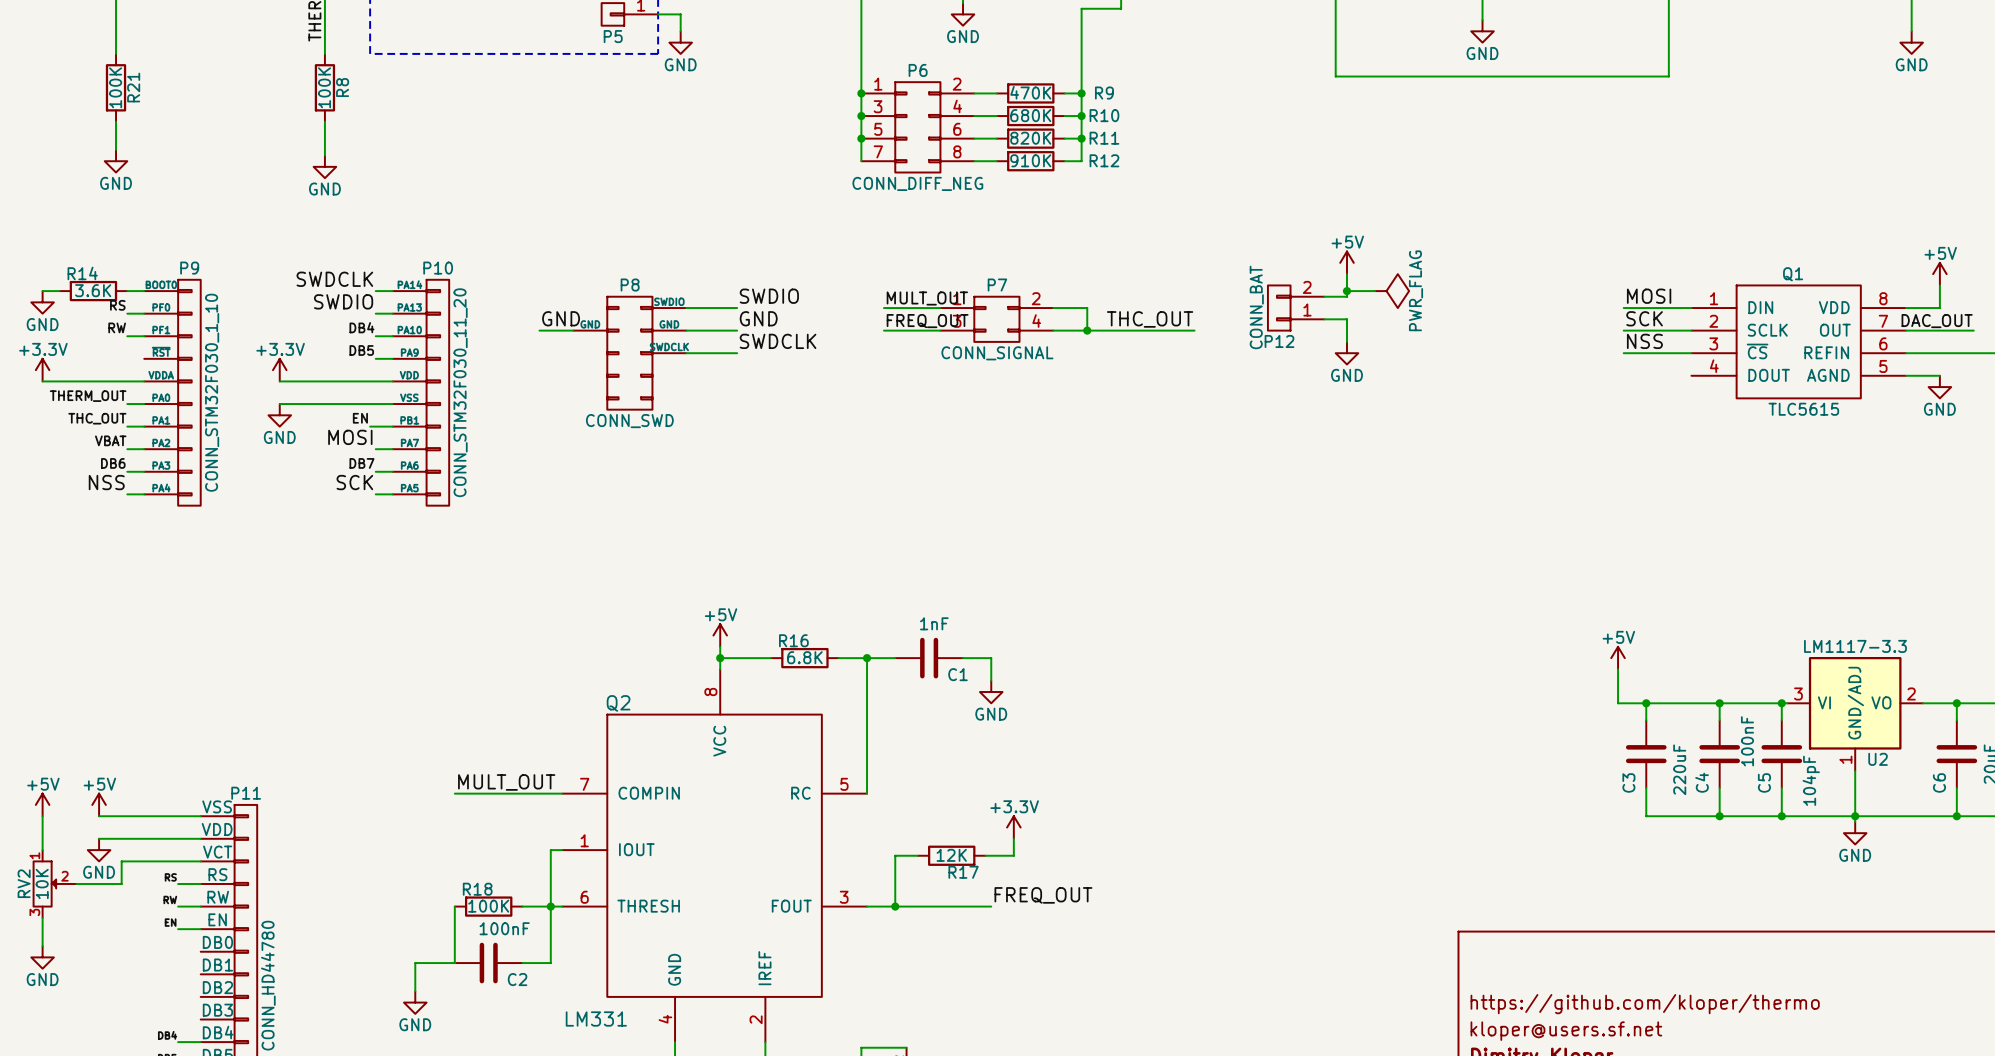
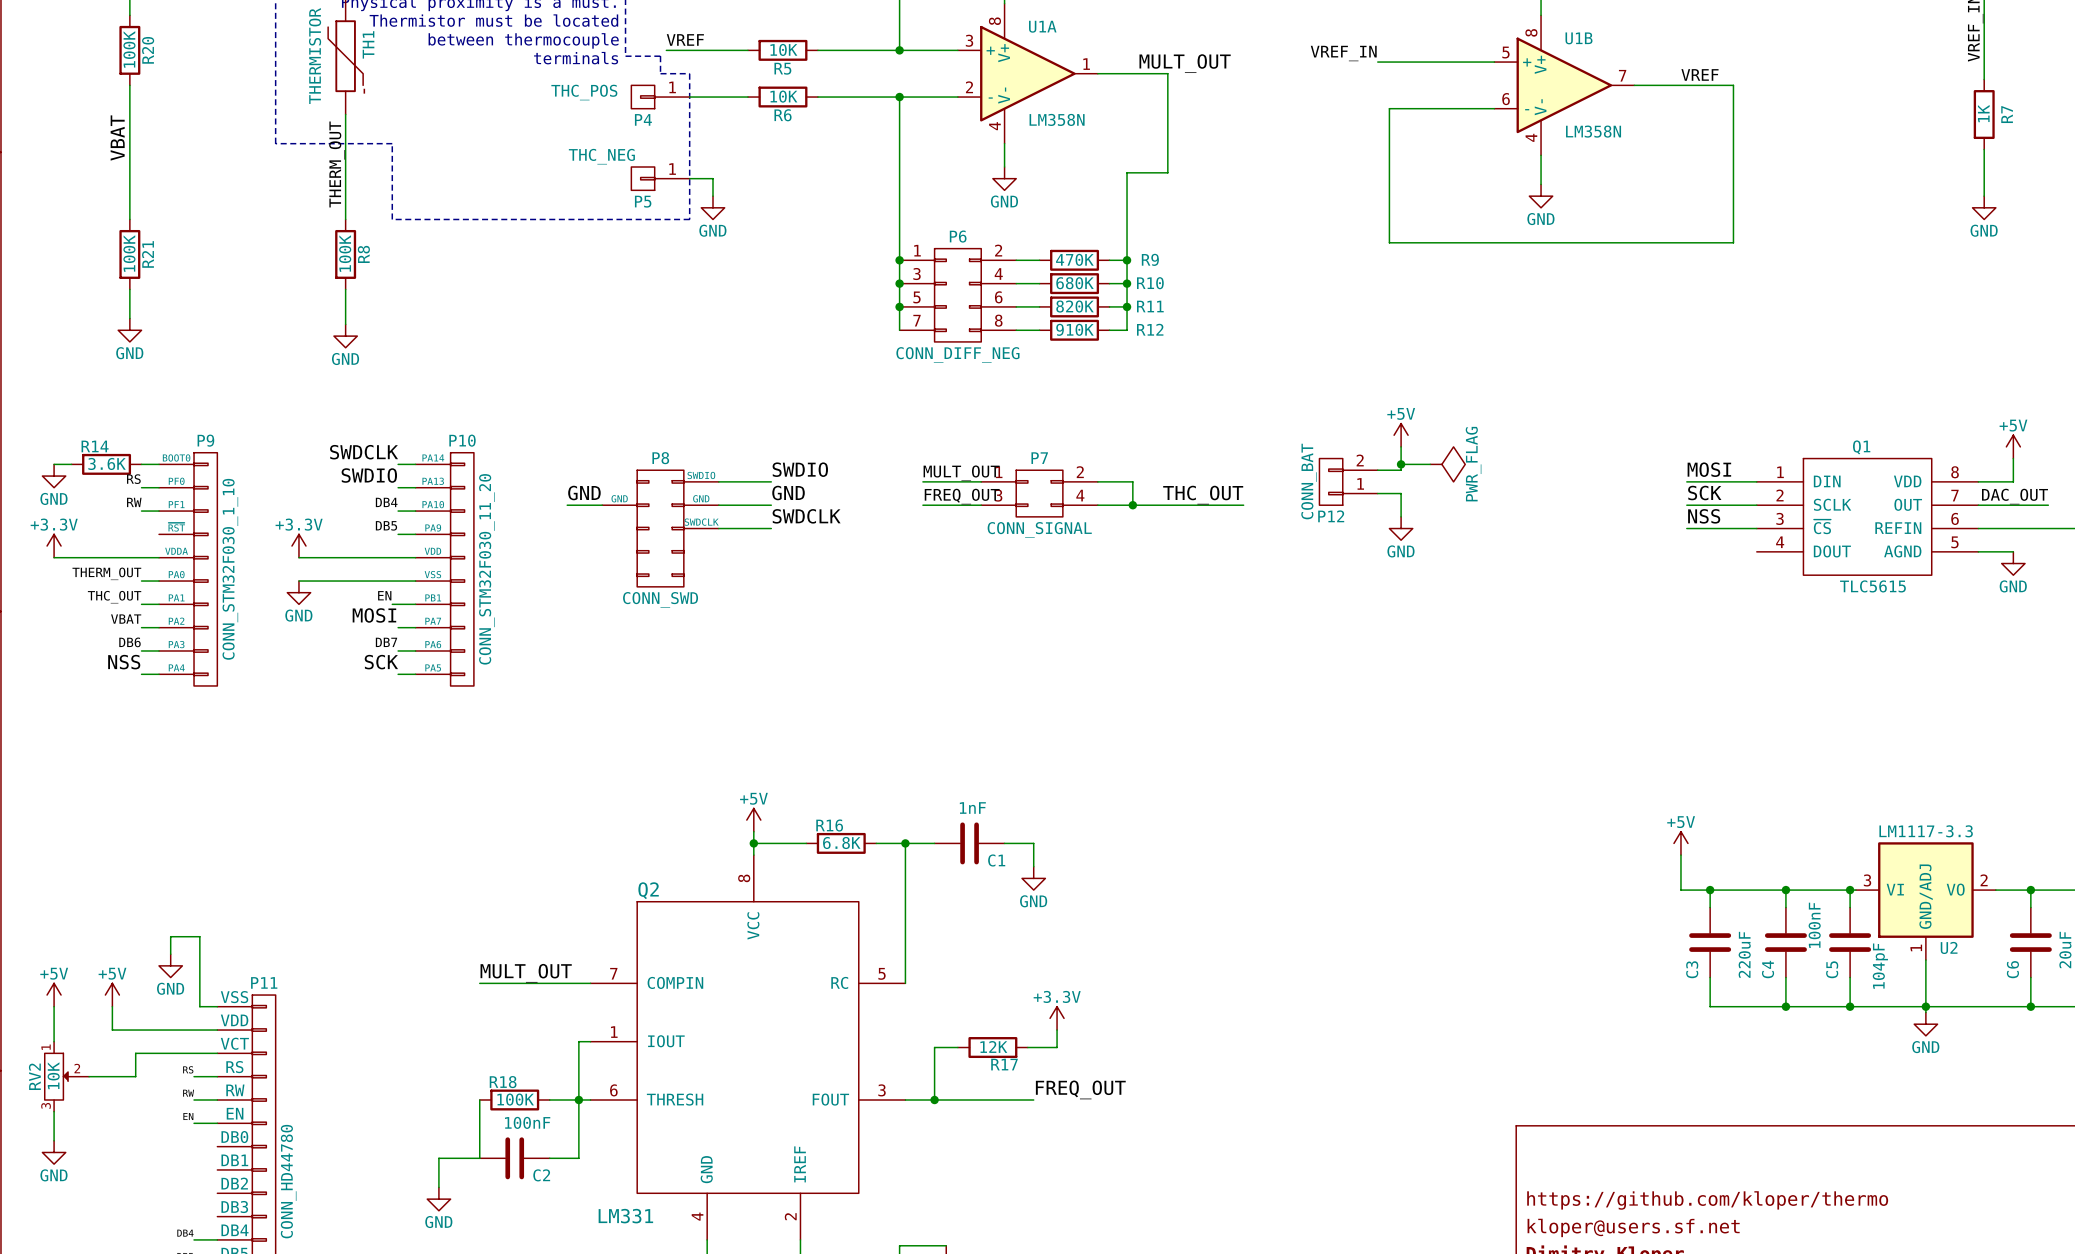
wire: (99, 816) (183, 816) -> (170, 954) (170, 936) (199, 936) (199, 1006)
wire: none -> (112, 1006) (112, 1030)
power symbol position: GND (99, 850) -> GND (170, 965)

